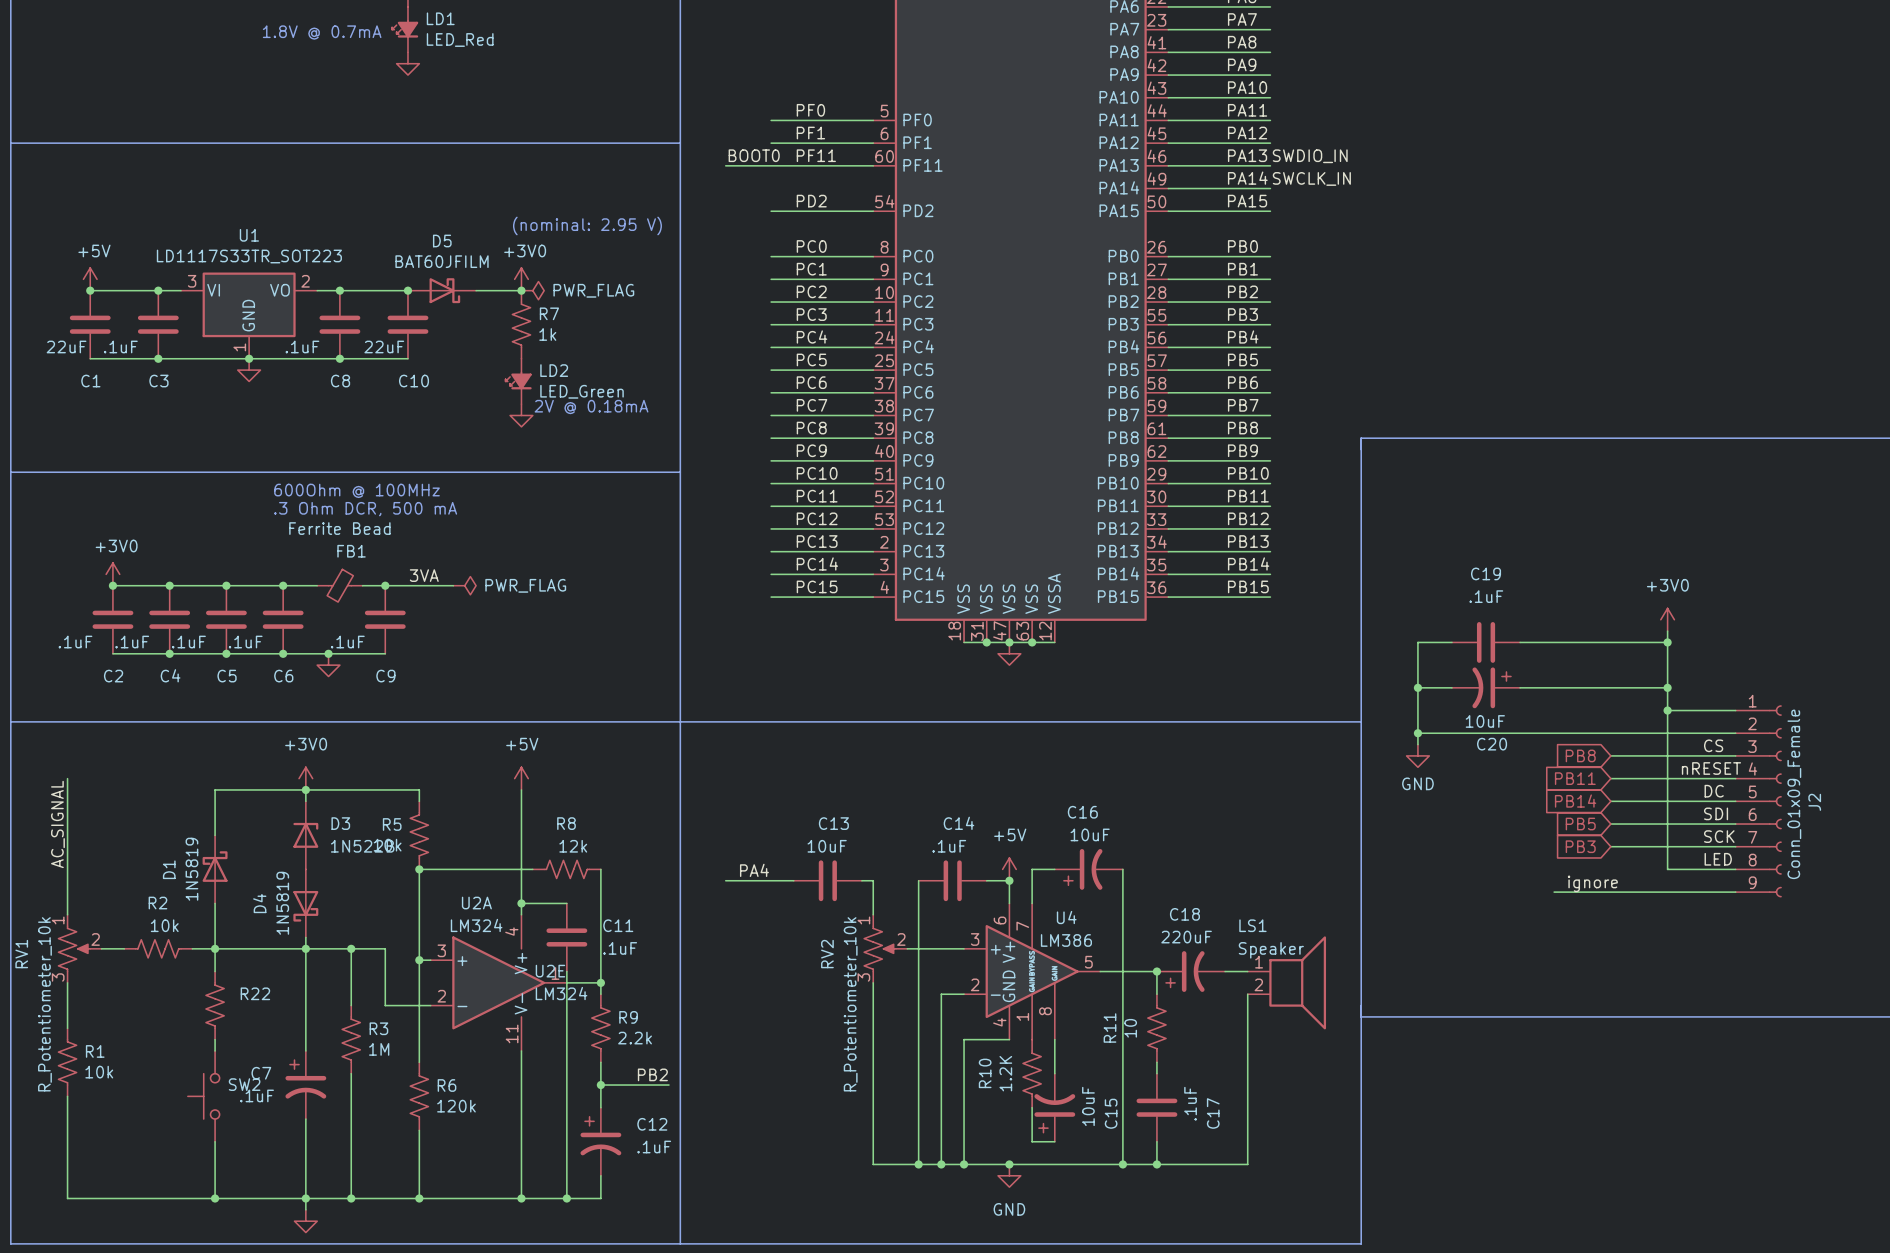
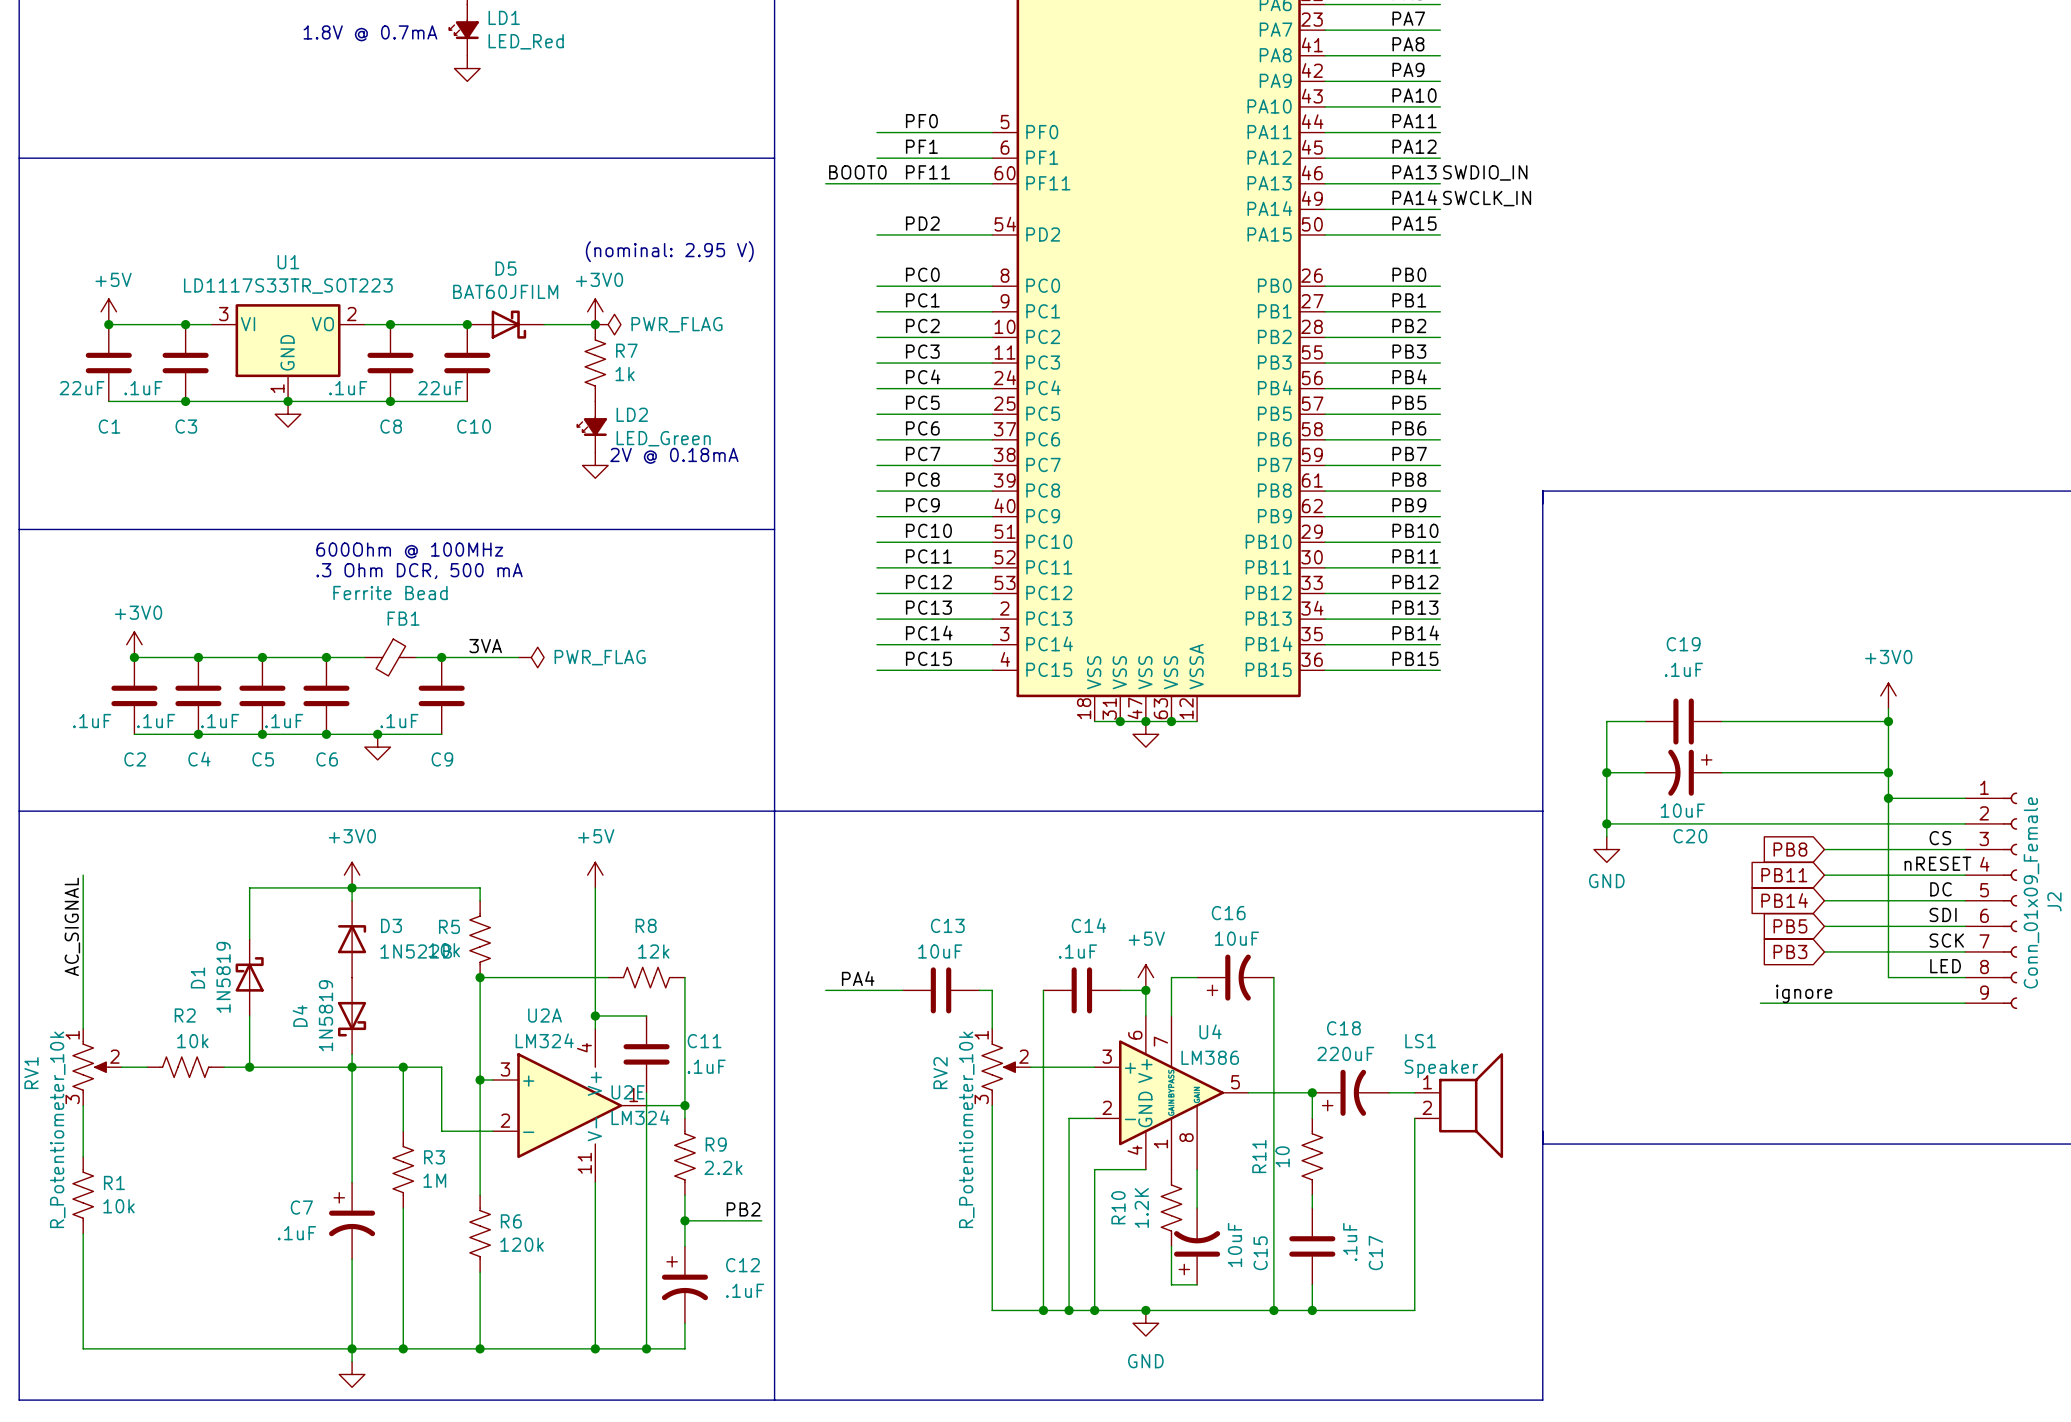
wire: (215, 948) (215, 971) -> none
R22: (215, 1005) -> none
wire: (215, 1039) (215, 1050) -> none
SW2: (203, 1096) -> none
wire: (215, 1141) (215, 1198) -> none
junction: (215, 1198) -> none

